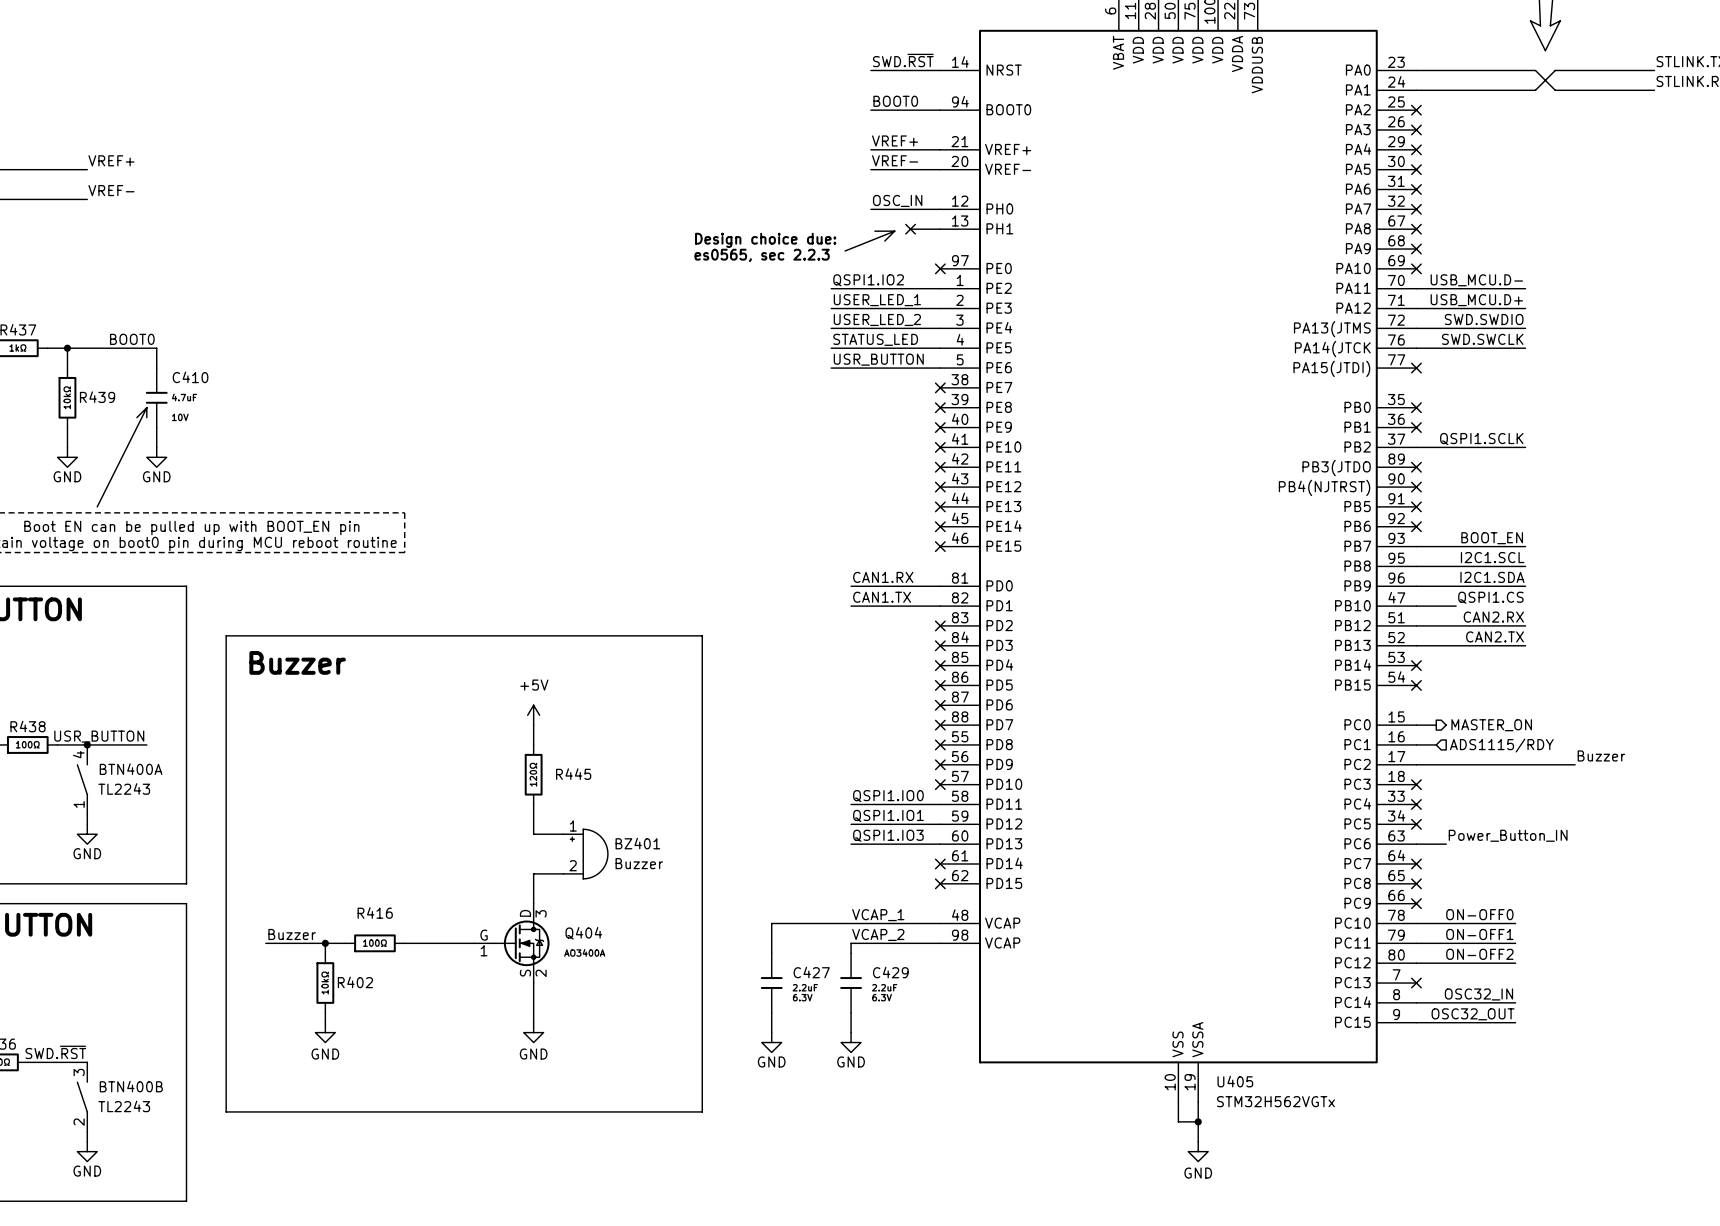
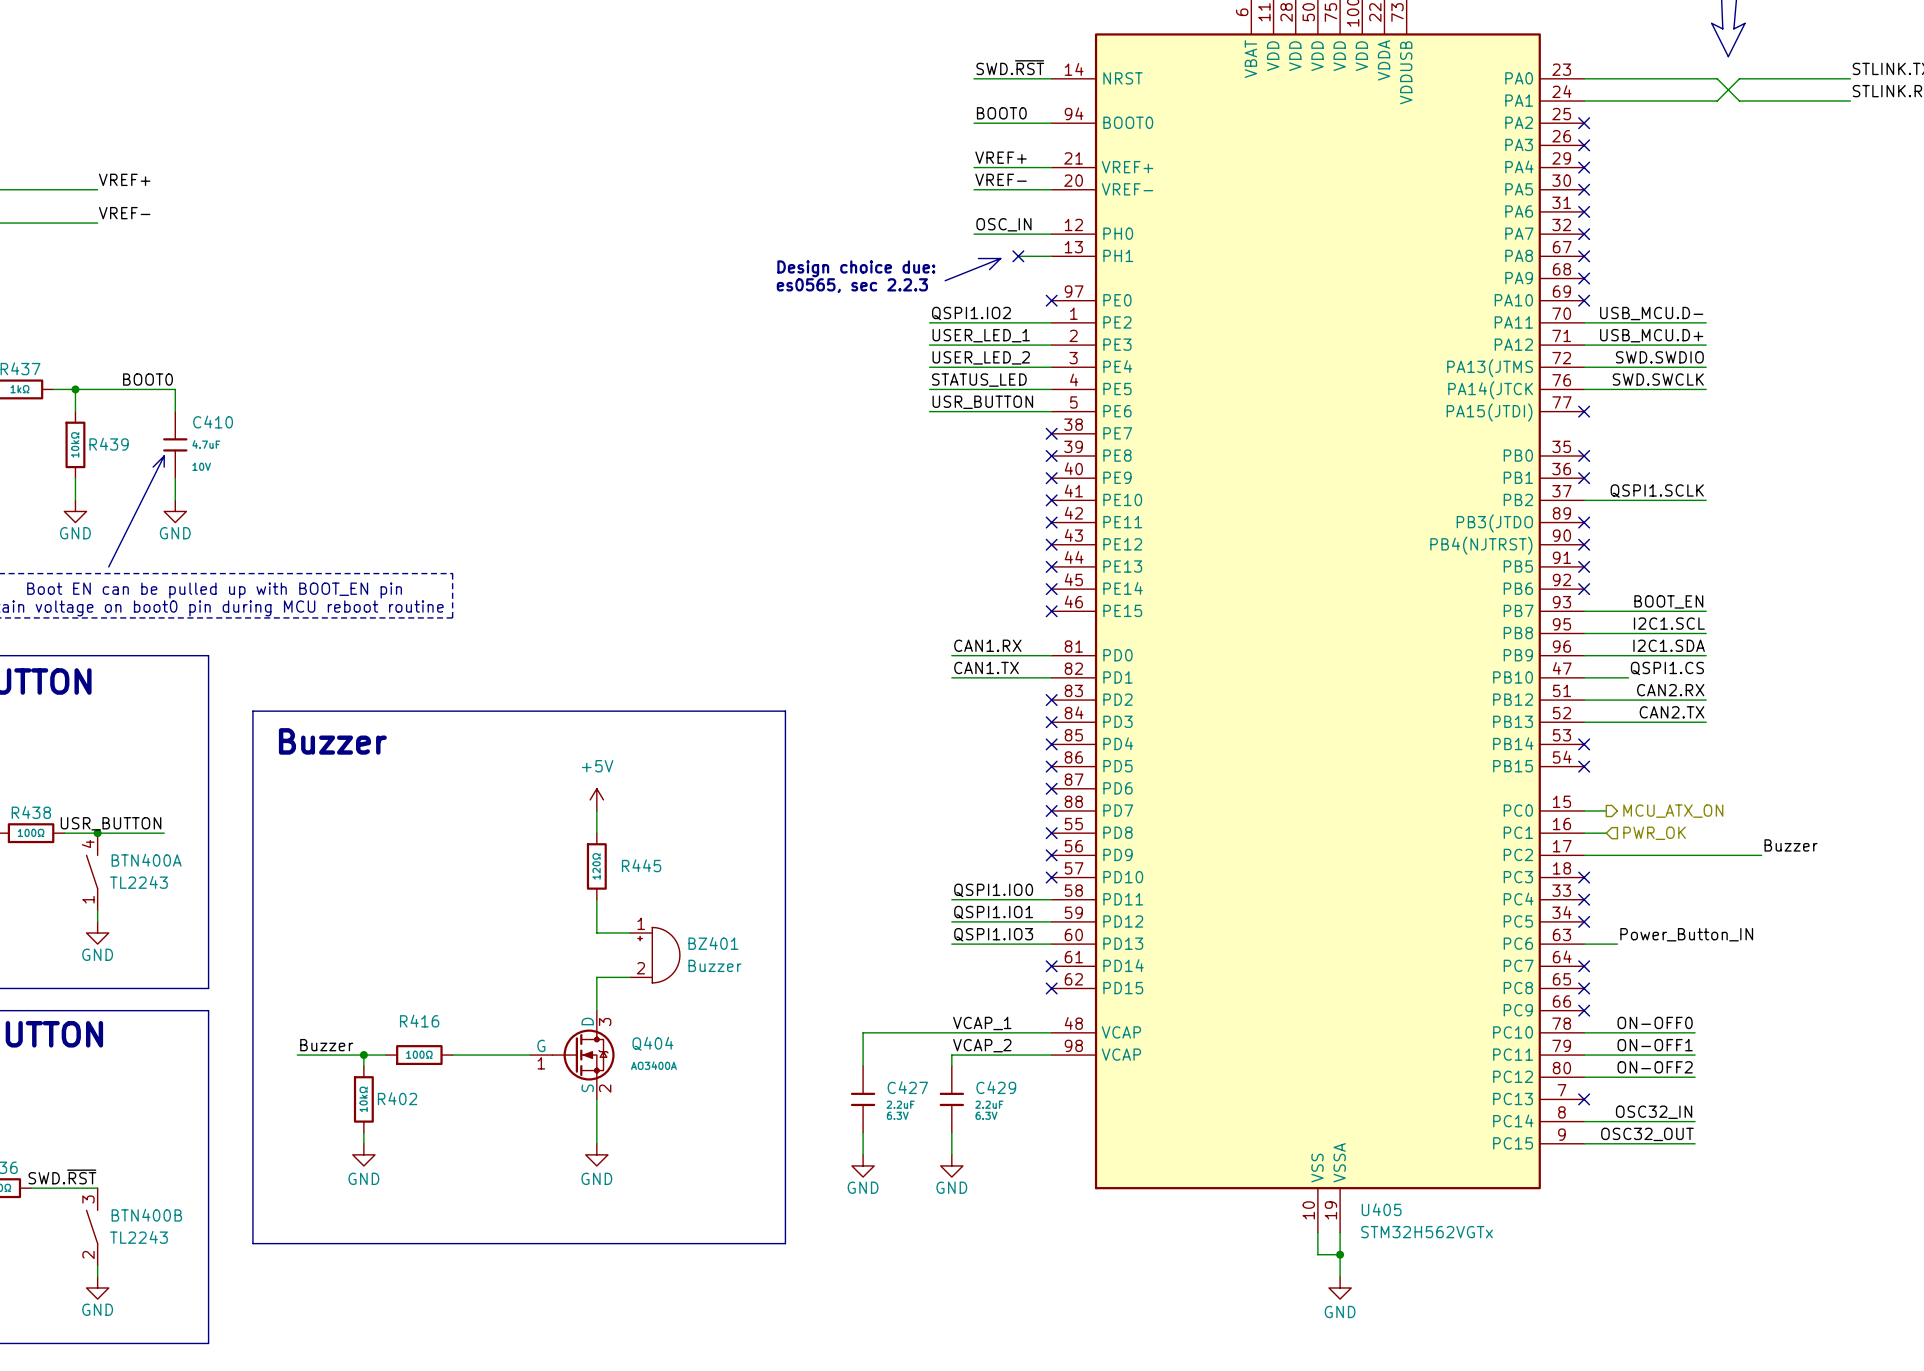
hierarchical label: MASTER_ON (1491, 725) -> MCU_ATX_ON (1673, 811)
hierarchical label: ADS1115/RDY (1501, 745) -> PWR_OK (1654, 833)

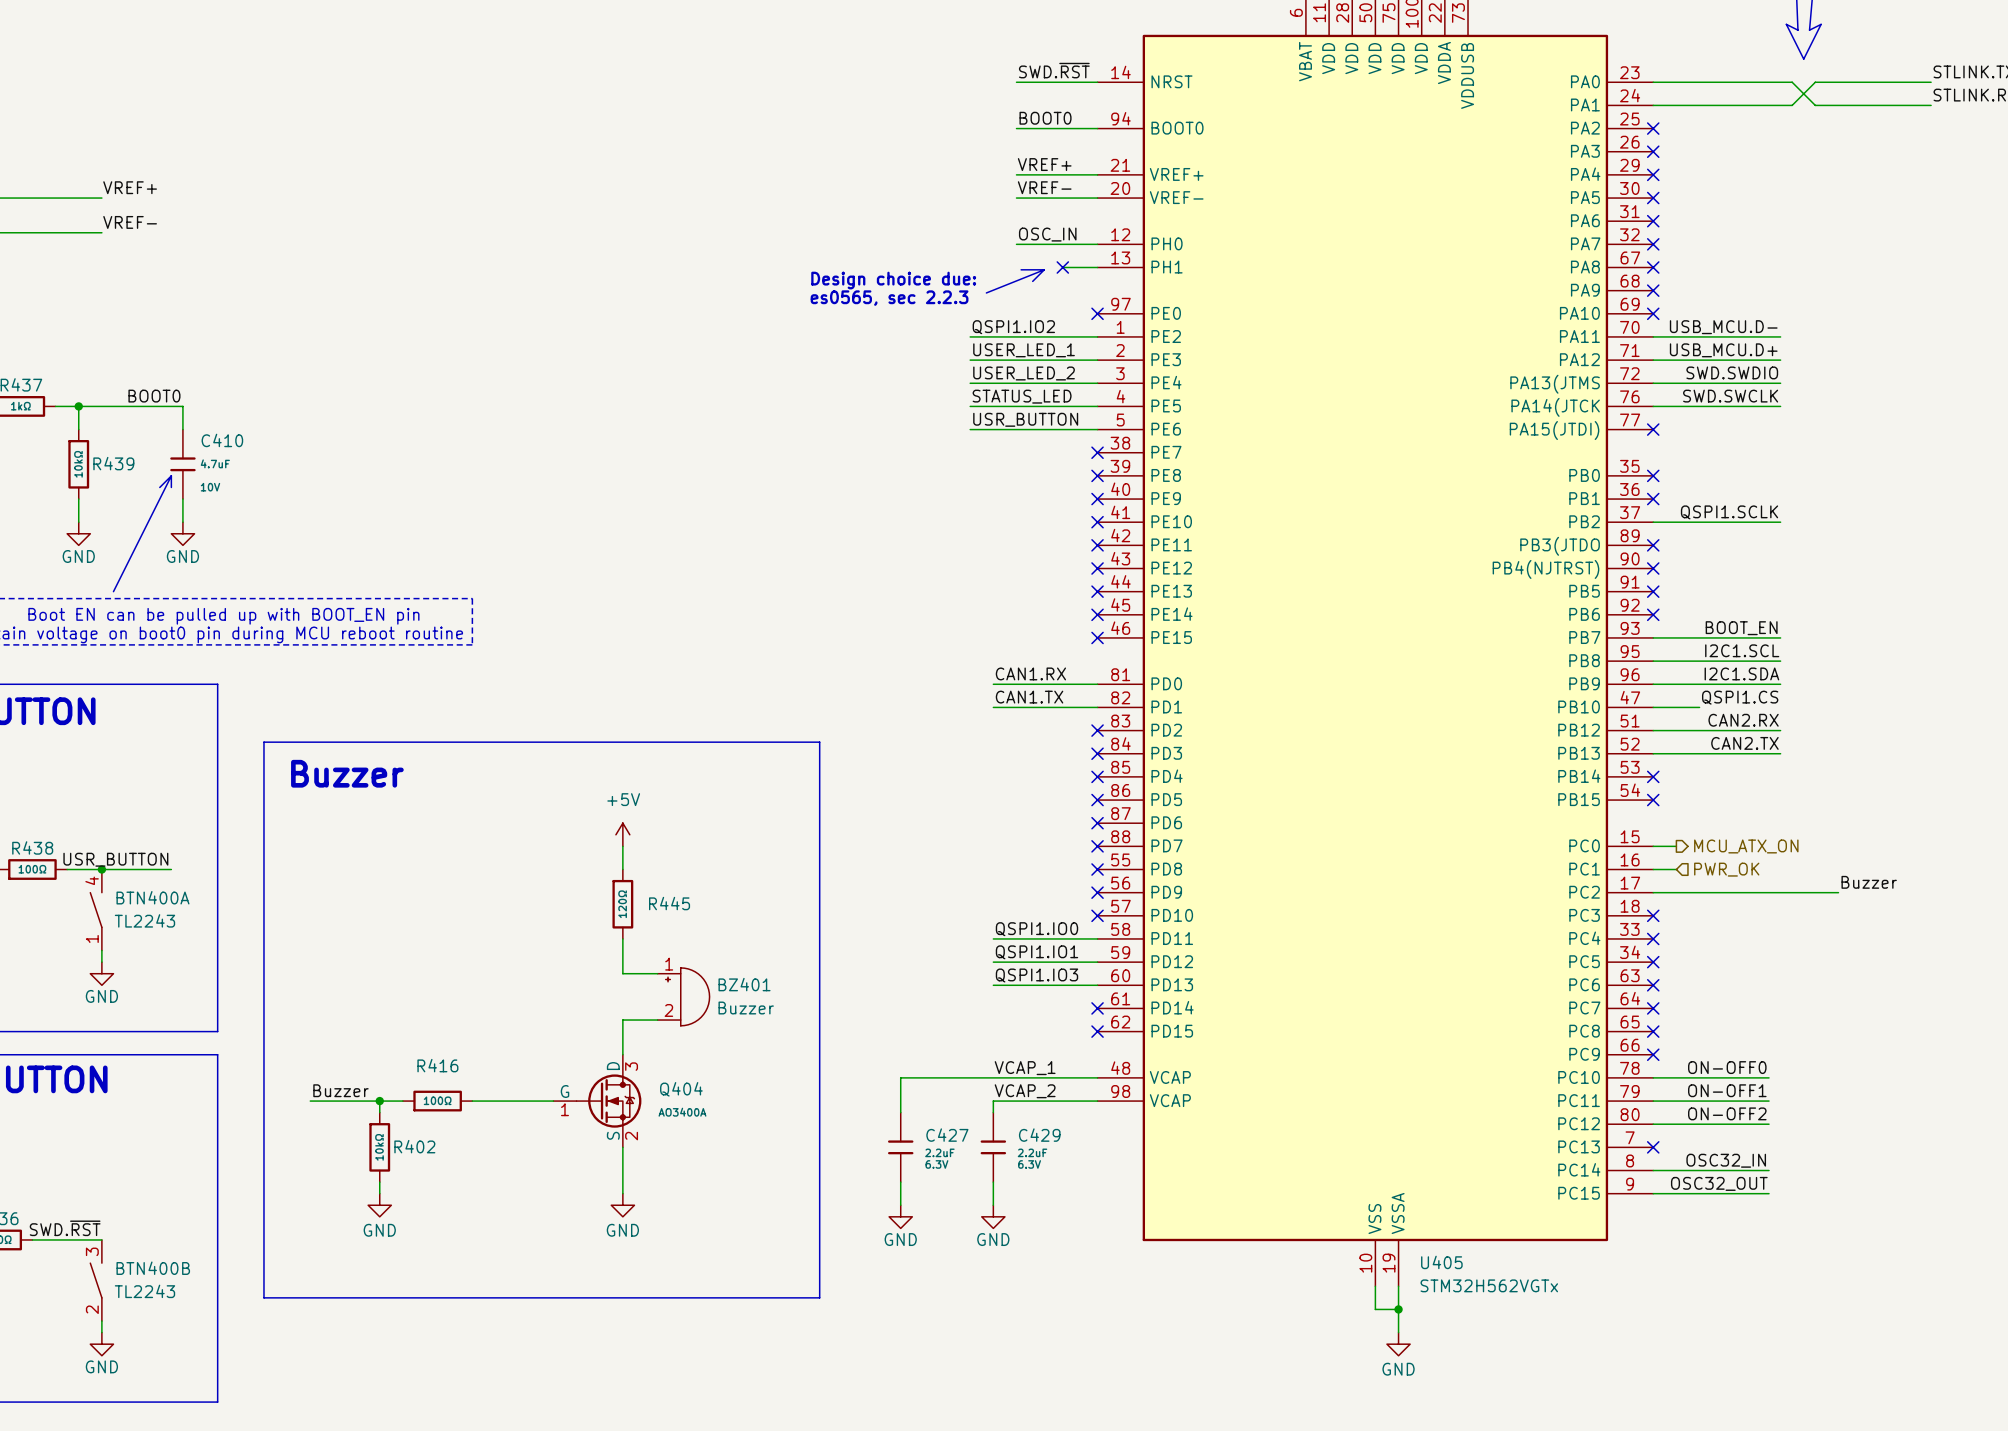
label: Power_Button_IN (1686, 934) -> none
wire: (1584, 944) (1617, 944) -> none
no-connect mark: none -> (1653, 985)

